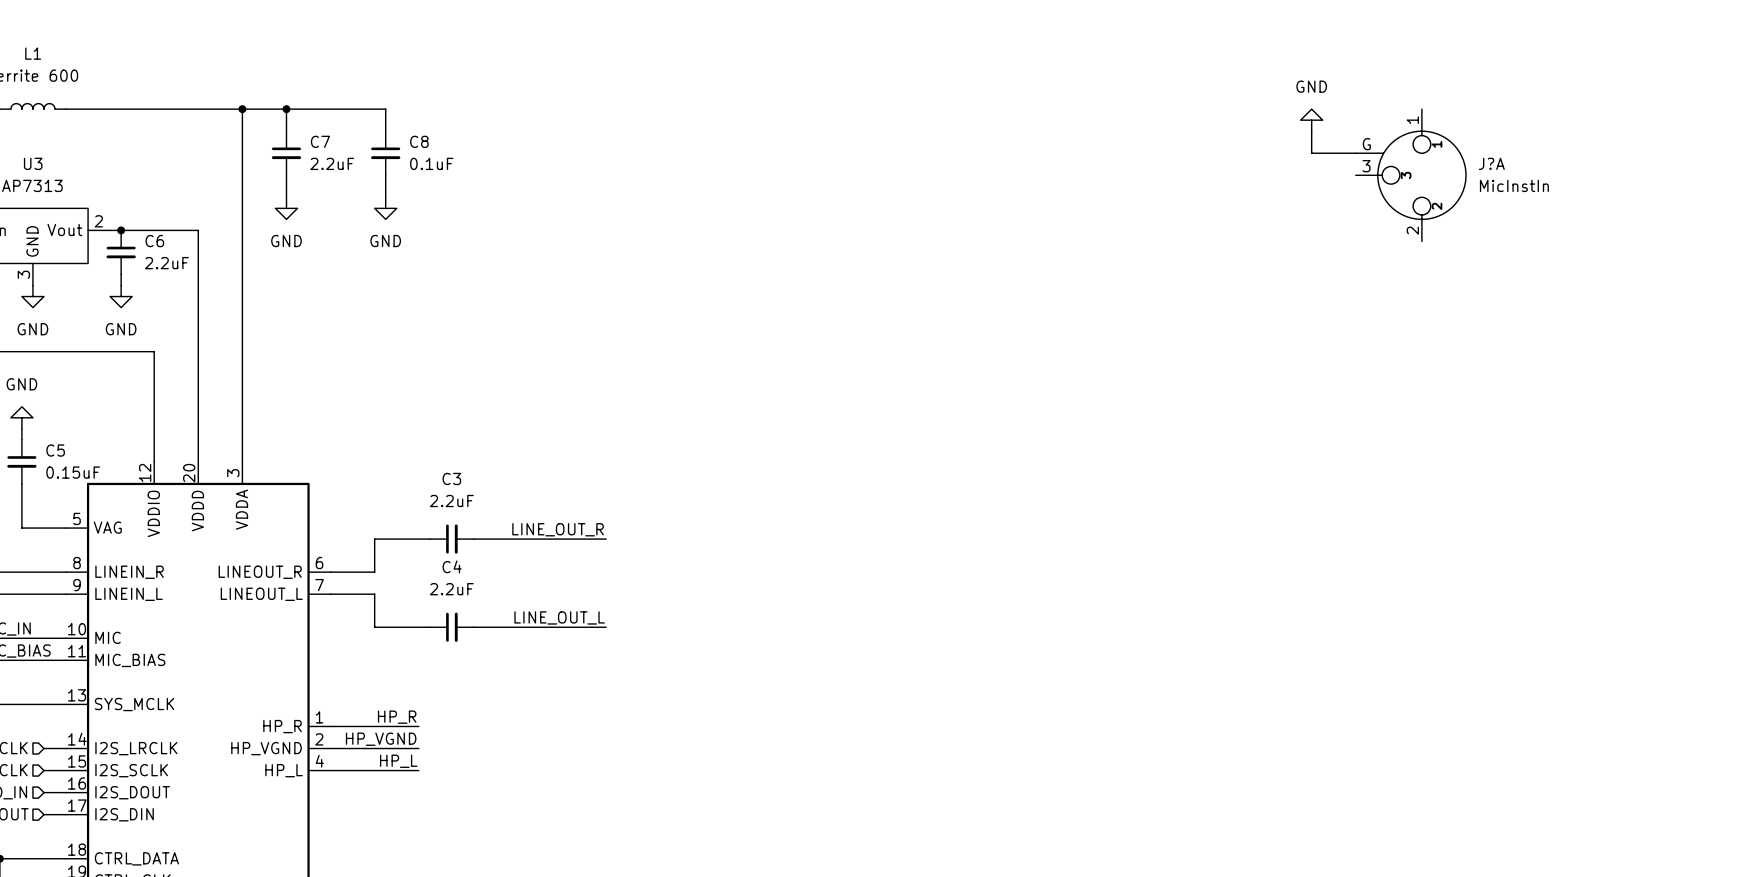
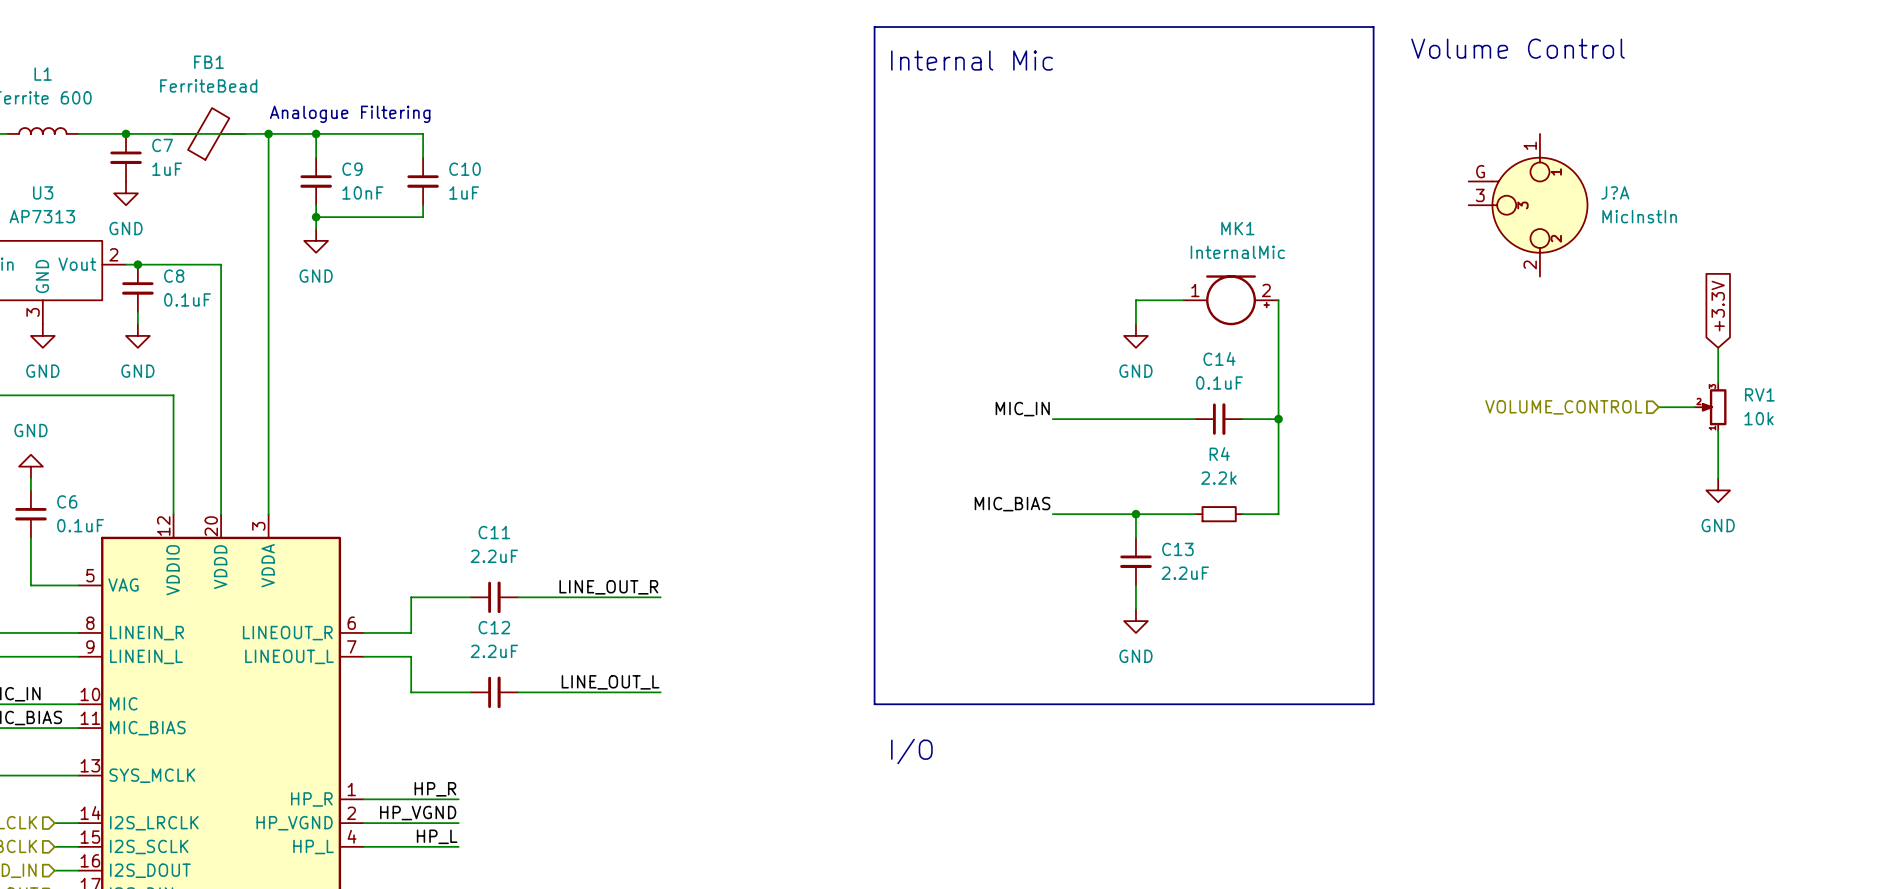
line: none -> (874, 27) (874, 704) (1373, 704) (1373, 27) (874, 27)
text: none -> Volume Control (1518, 48)
text: none -> Internal Mic (972, 60)
text: none -> Analogue Filtering (350, 114)
junction: none -> (126, 133)
FB1: none -> FerriteBead (209, 133)
power symbol: GND (1311, 120) -> none
C7: none -> 1uF (126, 157)
wire: (1311, 131) (1311, 153) (1355, 153) -> none
C7 name: C7 (320, 141) -> C9 (352, 169)
C8 name: C8 (419, 141) -> C10 (465, 169)
C7 value: 2.2uF (332, 163) -> 10nF (362, 192)
C8 value: 0.1uF (431, 163) -> 1uF (464, 192)
power symbol: none -> GND (126, 193)
junction: none -> (316, 217)
wire: (385, 186) (385, 197) -> (423, 217) (316, 217)
power symbol: GND (385, 208) -> none
C6 name: C6 (154, 241) -> C8 (174, 276)
C6 value: 2.2uF (166, 263) -> 0.1uF (187, 299)
wire: none -> (1183, 300) (1135, 300) (1135, 324)
MK1: none -> InternalMic (1231, 300)
wire: none -> (1278, 300) (1278, 514) (1242, 514)
global label: none -> +3.3V (1718, 306)
power symbol: none -> GND (1135, 335)
wire: none -> (1718, 347) (1718, 383)
hierarchical label: none -> VOLUME_CONTROL (1563, 407)
wire: none -> (1658, 407) (1694, 407)
RV1: none -> 10k (1710, 407)
label: none -> MIC_IN (1022, 409)
wire: none -> (1052, 419) (1195, 419)
C14: none -> 0.1uF (1219, 419)
wire: none -> (1242, 419) (1278, 419)
junction: none -> (1278, 419)
wire: none -> (1718, 430) (1718, 478)
power symbol: none -> GND (1718, 490)
C5 name: C5 (55, 450) -> C6 (67, 501)
label: none -> MIC_BIAS (1012, 504)
wire: none -> (1052, 514) (1195, 514)
wire: none -> (1135, 514) (1135, 537)
junction: none -> (1135, 514)
R4: none -> 2.2k (1219, 514)
C5 value: 0.15uF (73, 472) -> 0.1uF (80, 525)
C3 name: C3 (451, 478) -> C11 (494, 532)
C13: none -> 2.2uF (1135, 561)
wire: none -> (1135, 585) (1135, 609)
power symbol: none -> GND (1135, 621)
C4 name: C4 (452, 566) -> C12 (494, 627)
text: none -> I/O (911, 751)

